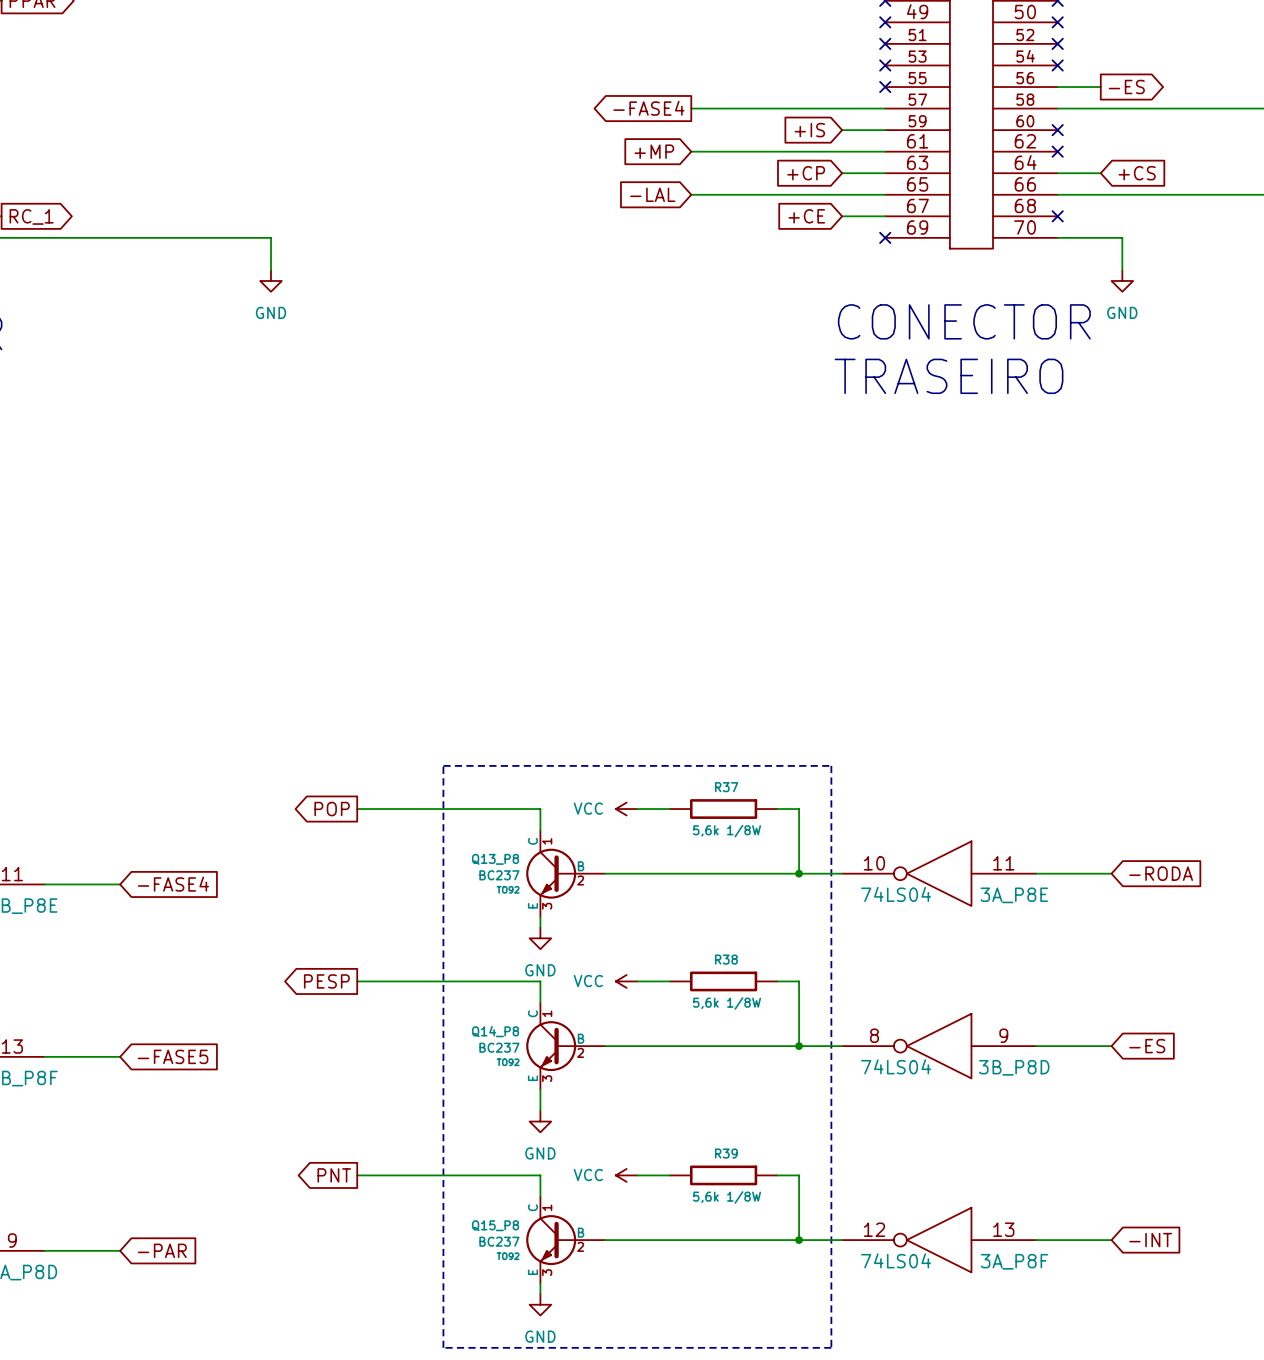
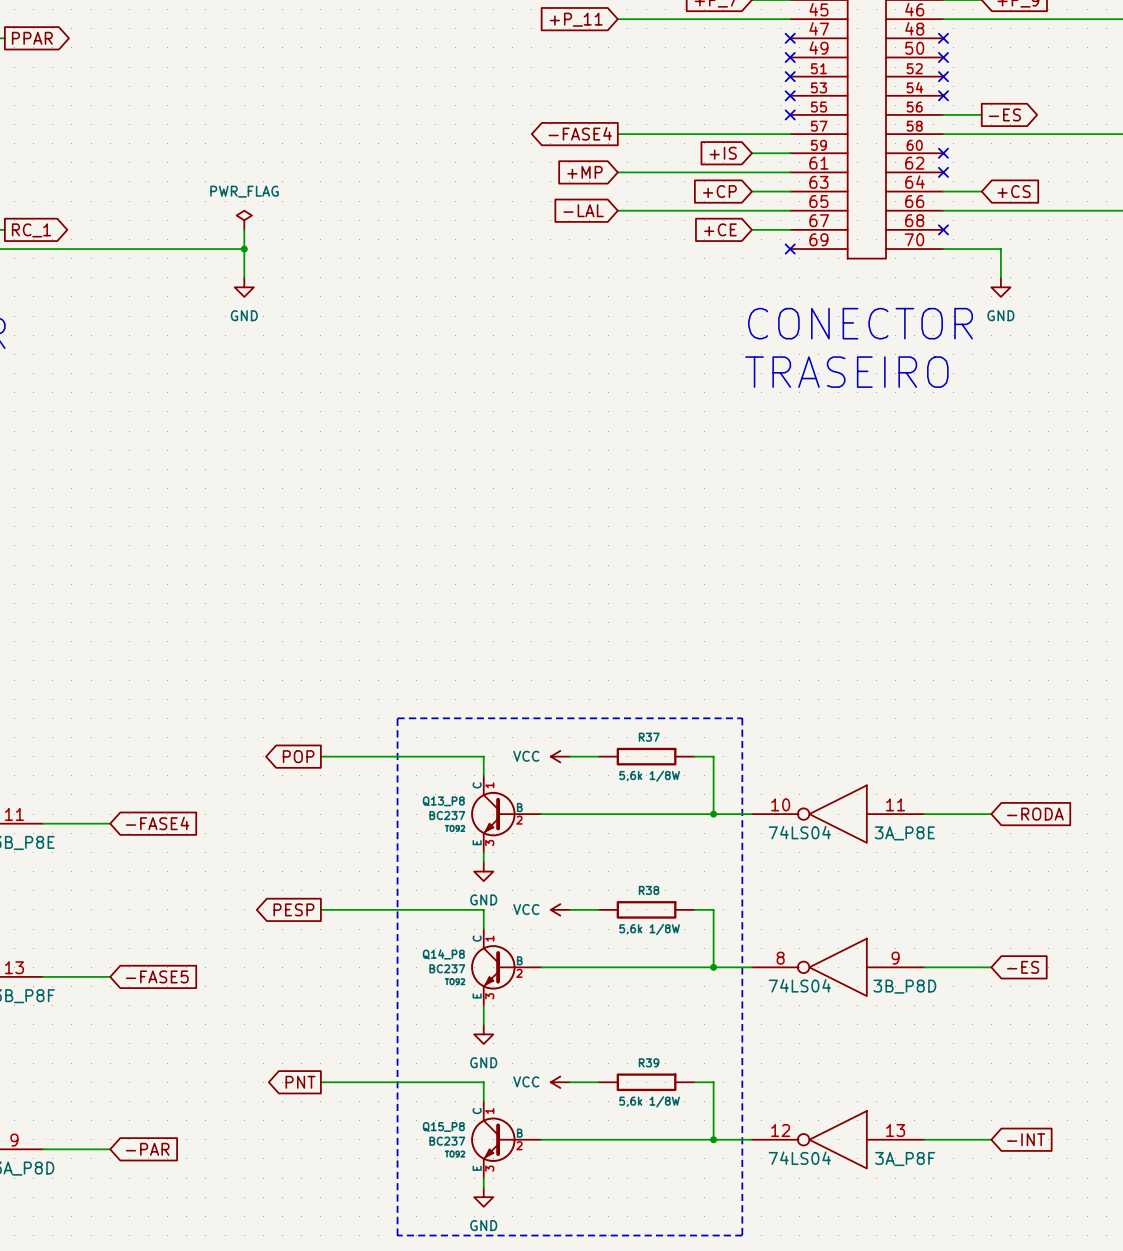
power symbol: none -> PWR_FLAG (244, 220)
wire: none -> (244, 229) (244, 249)
junction: none -> (244, 249)

